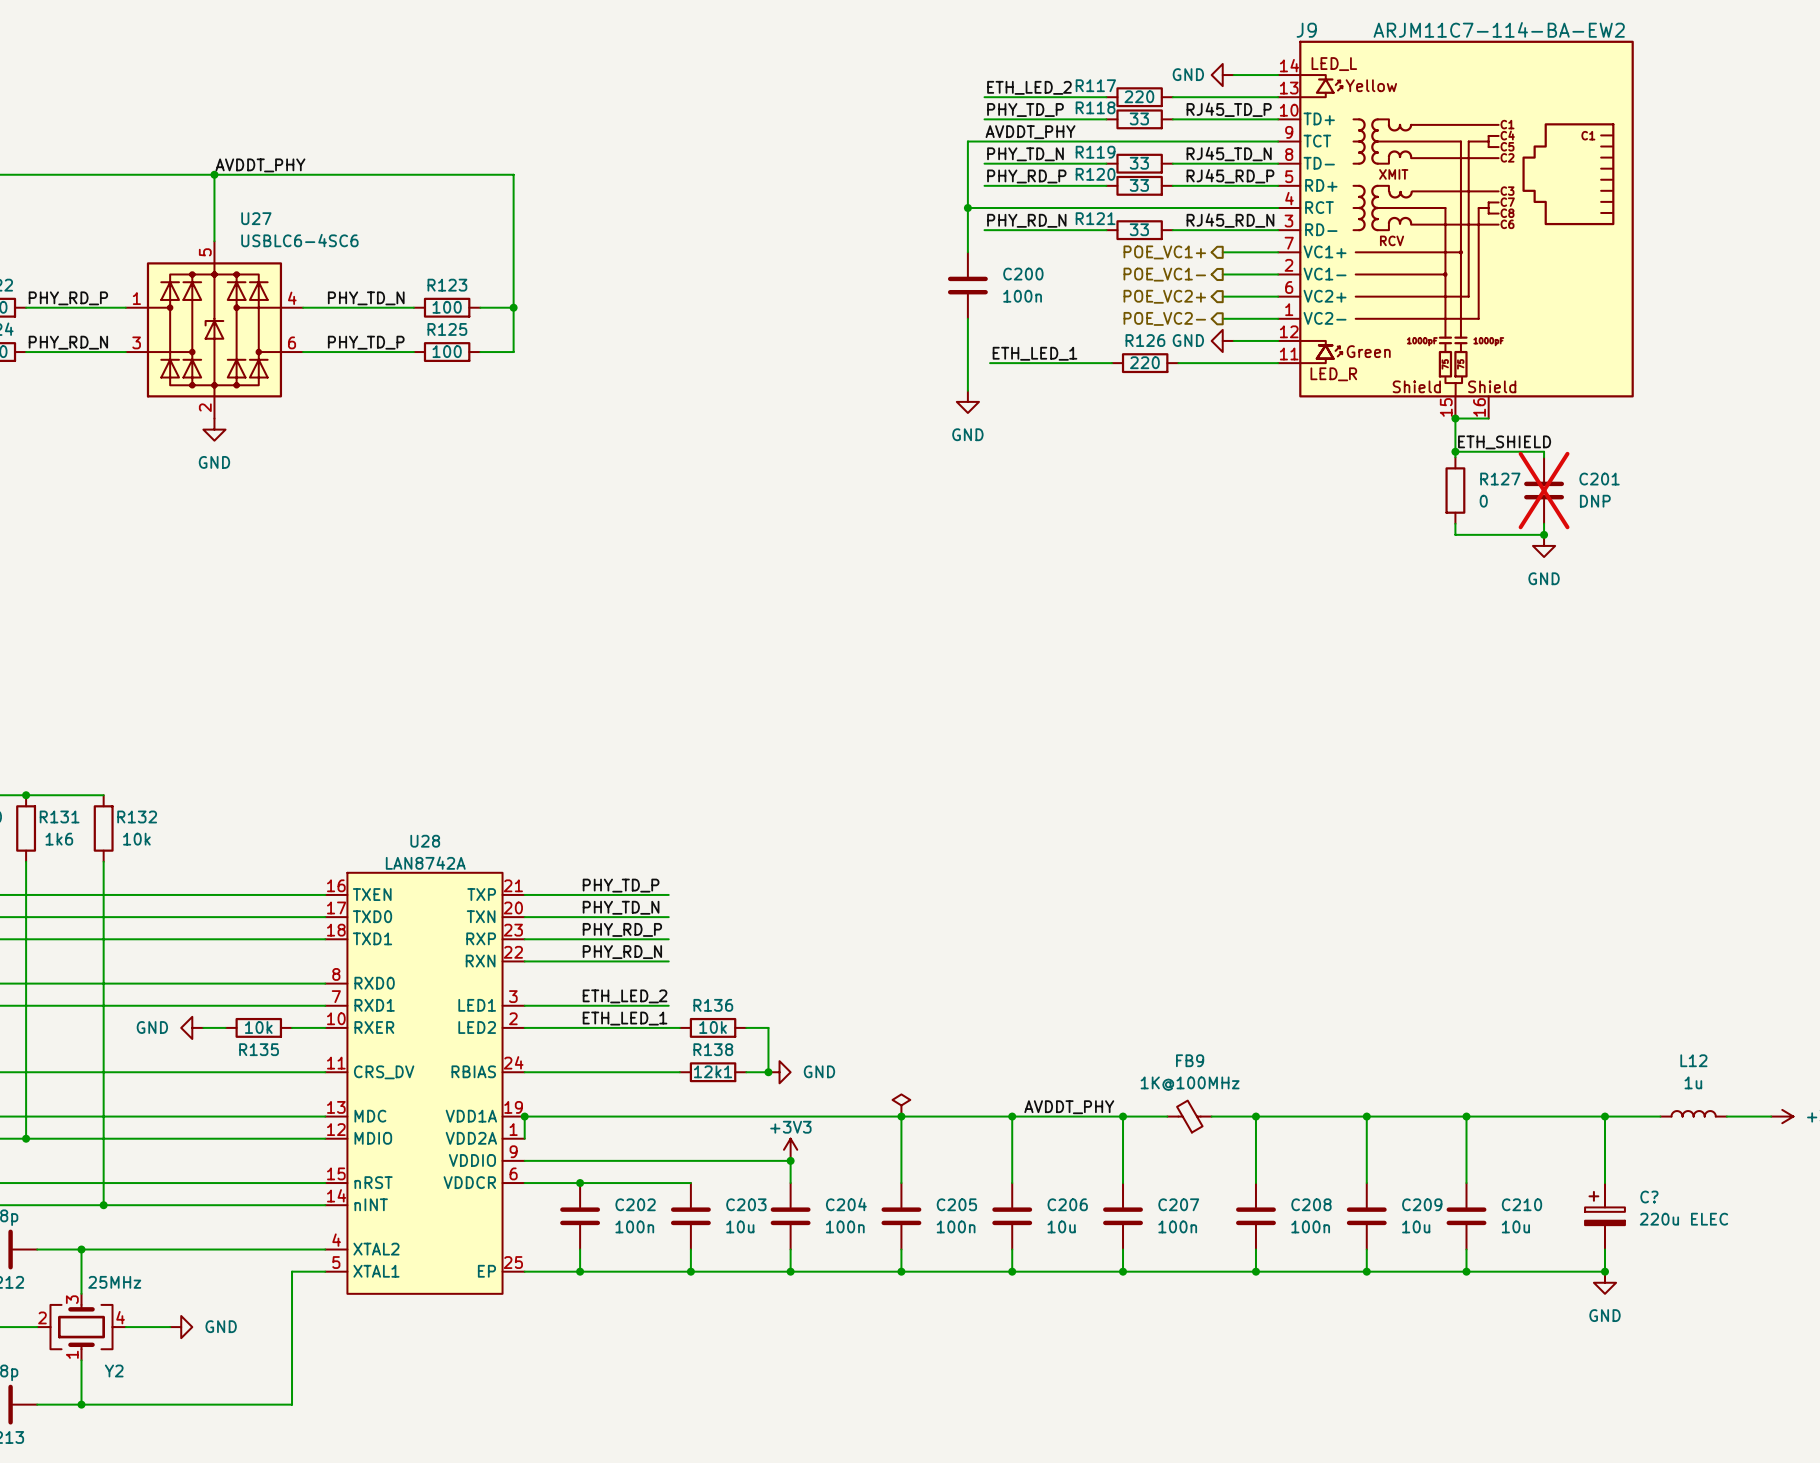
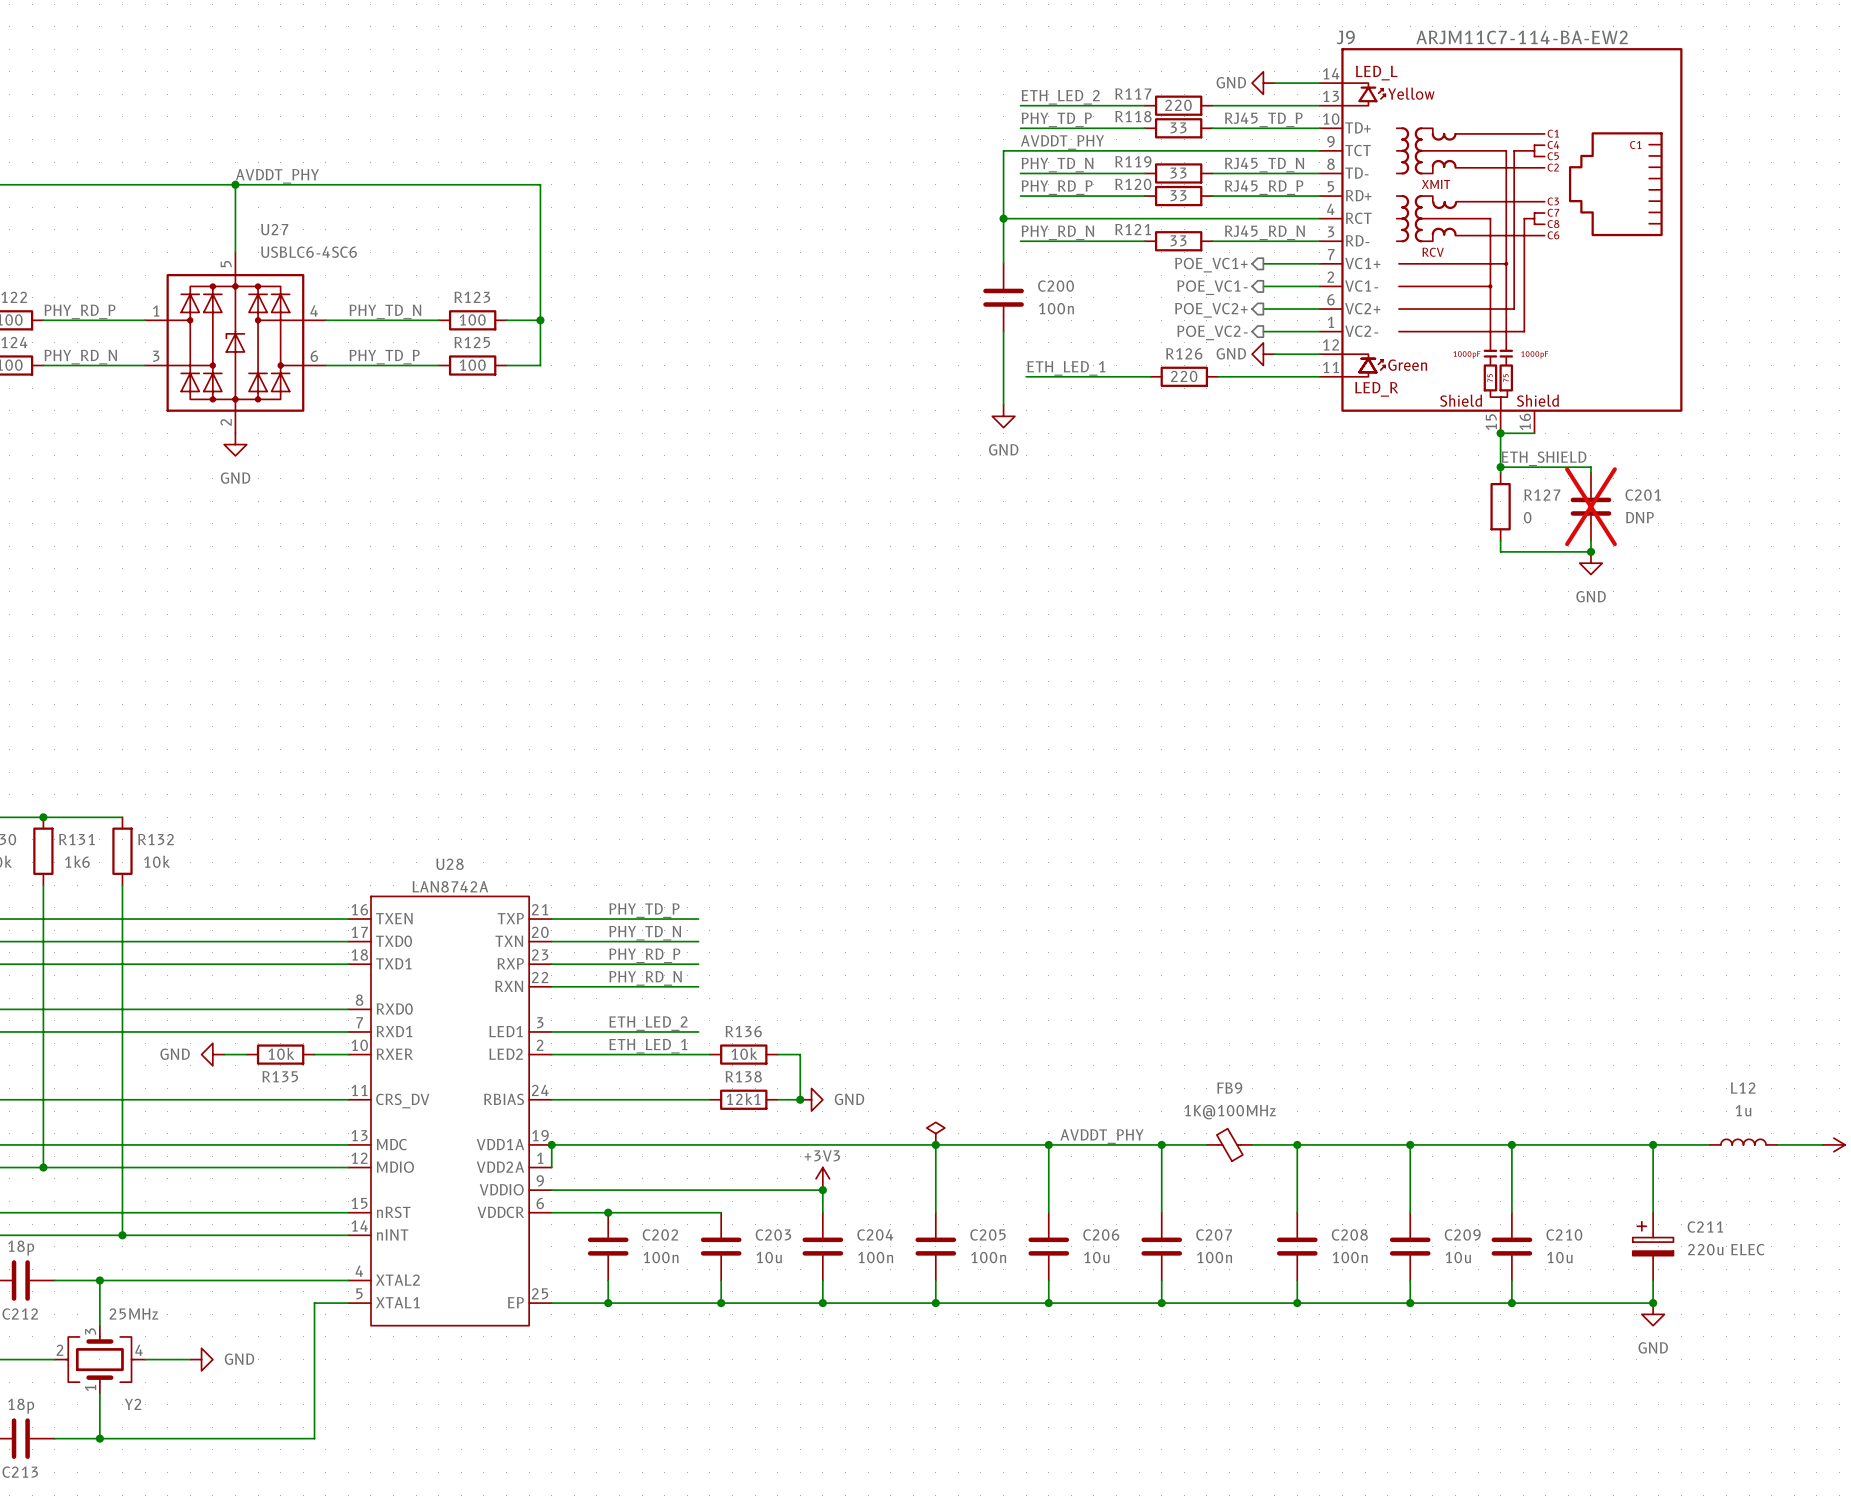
C? name: C? (1649, 1197) -> C211 (1705, 1227)

